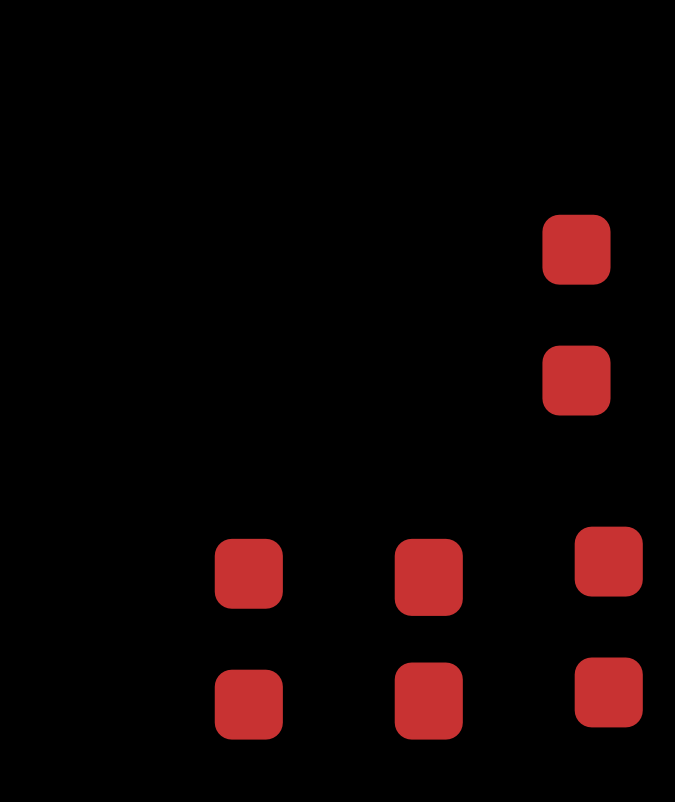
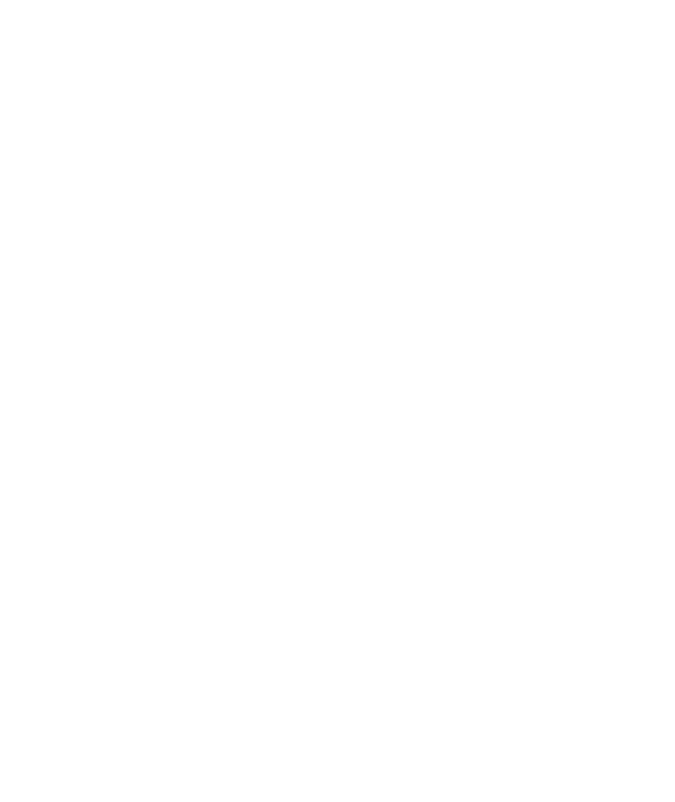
part: (576, 315) -> none
part: (608, 627) -> none
part: (248, 639) -> none
part: (428, 639) -> none

